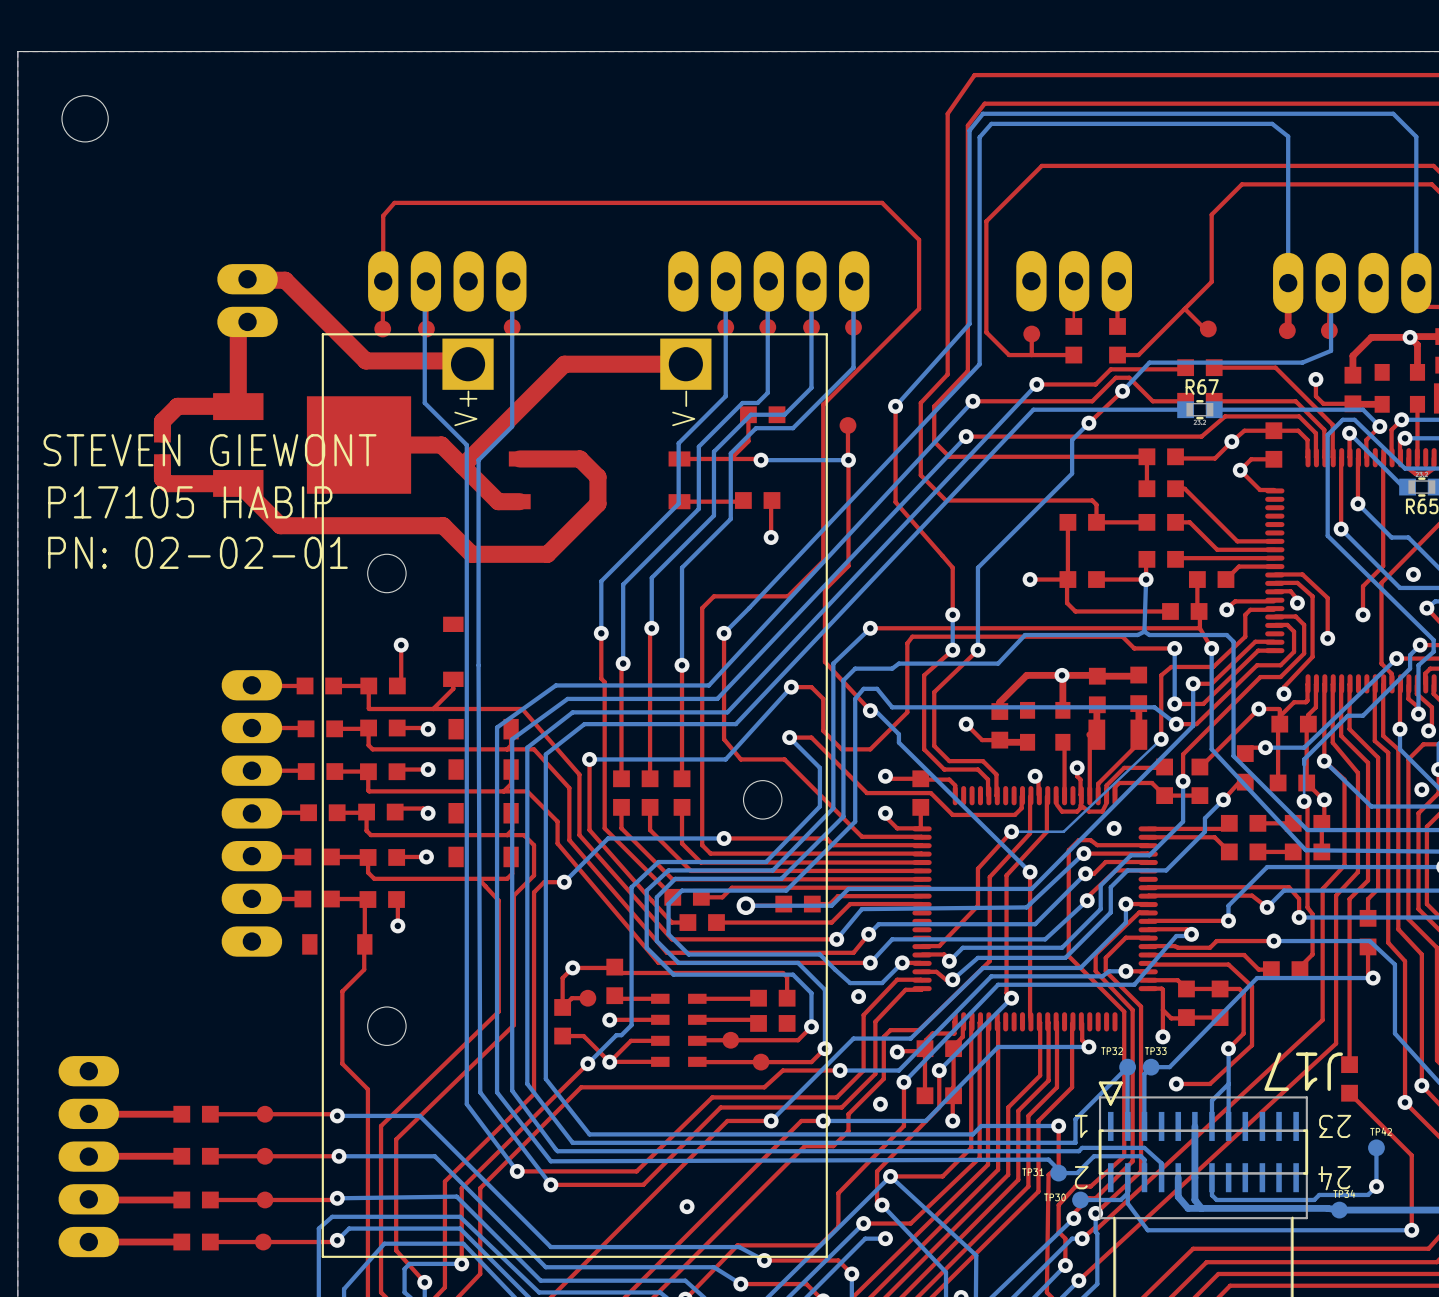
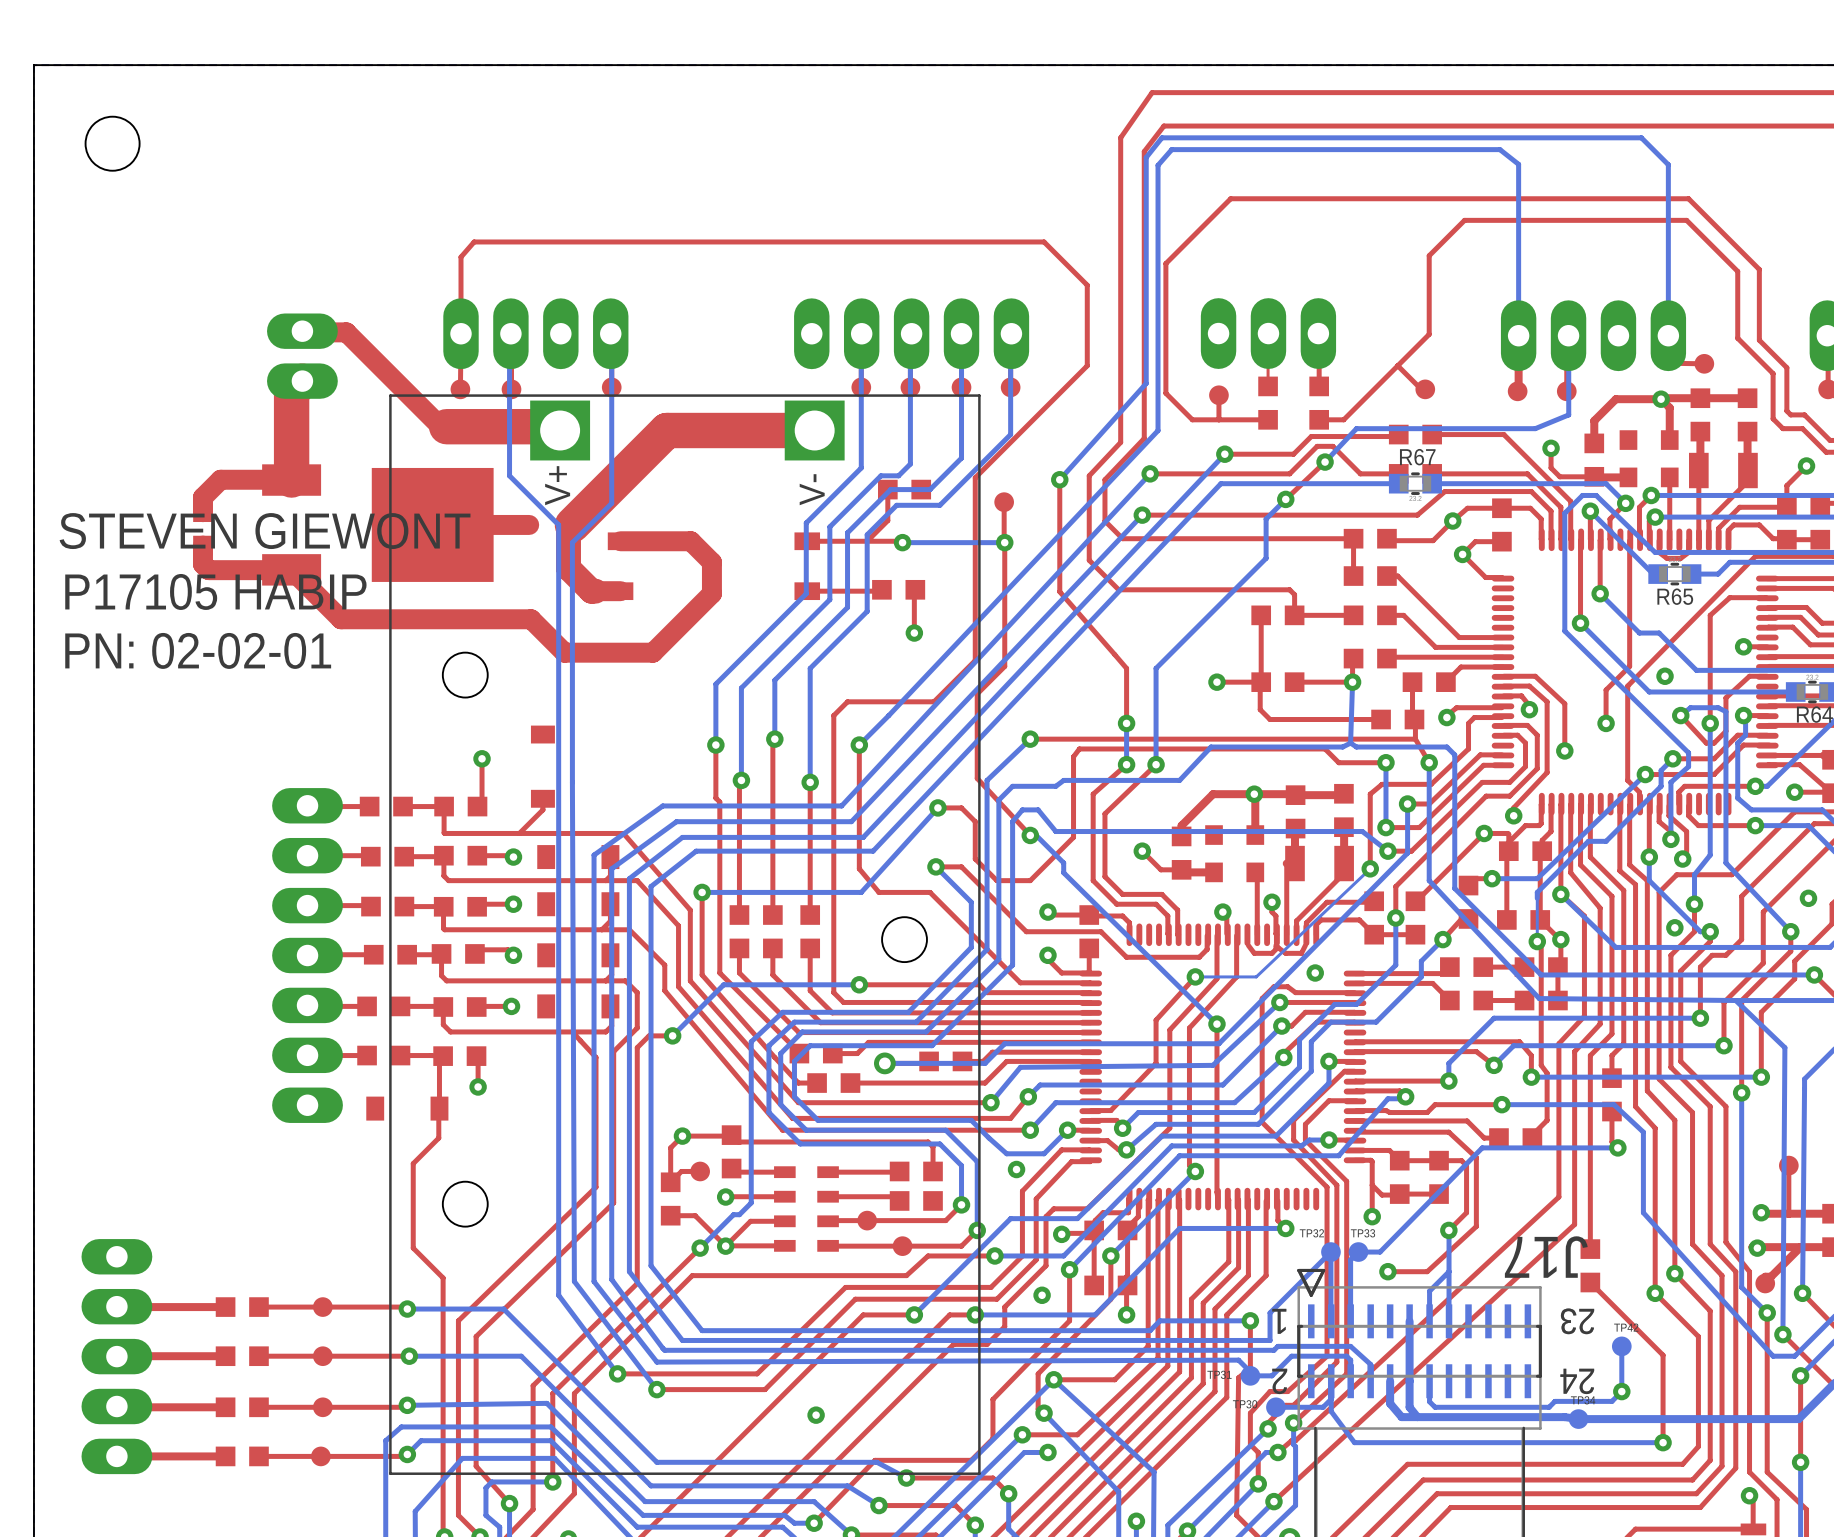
top track width: thin (247, 321) (238, 331) (238, 406) -> thick (302, 381) (291, 391) (291, 480)
top track width: thin (464, 360) (370, 360) -> thick (556, 426) (446, 426)
top track: (564, 364) (462, 466) -> (672, 430) (666, 430) (568, 528) (568, 568) (591, 591) (595, 591)
top track width: thin (685, 364) (564, 364) -> thick (814, 430) (672, 430)
top track: (441, 445) (498, 501) -> none

